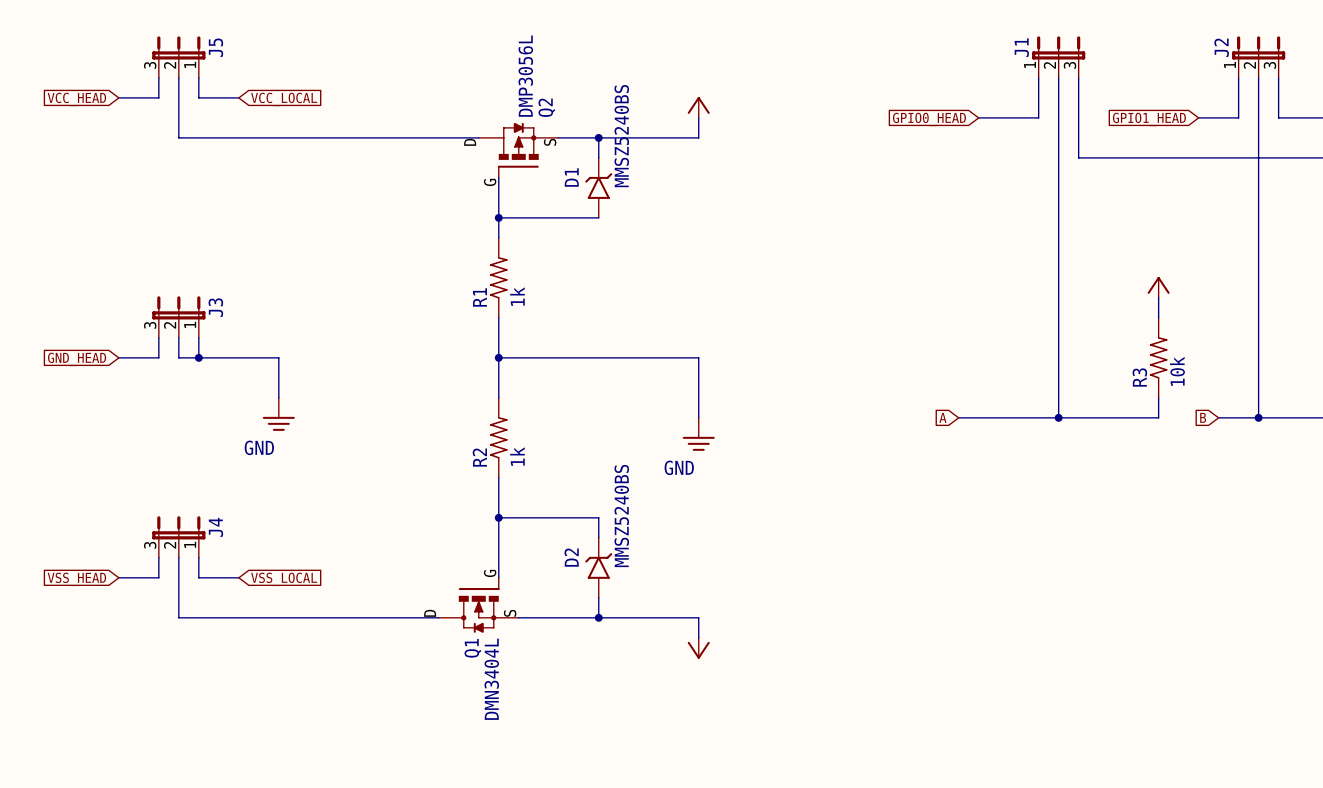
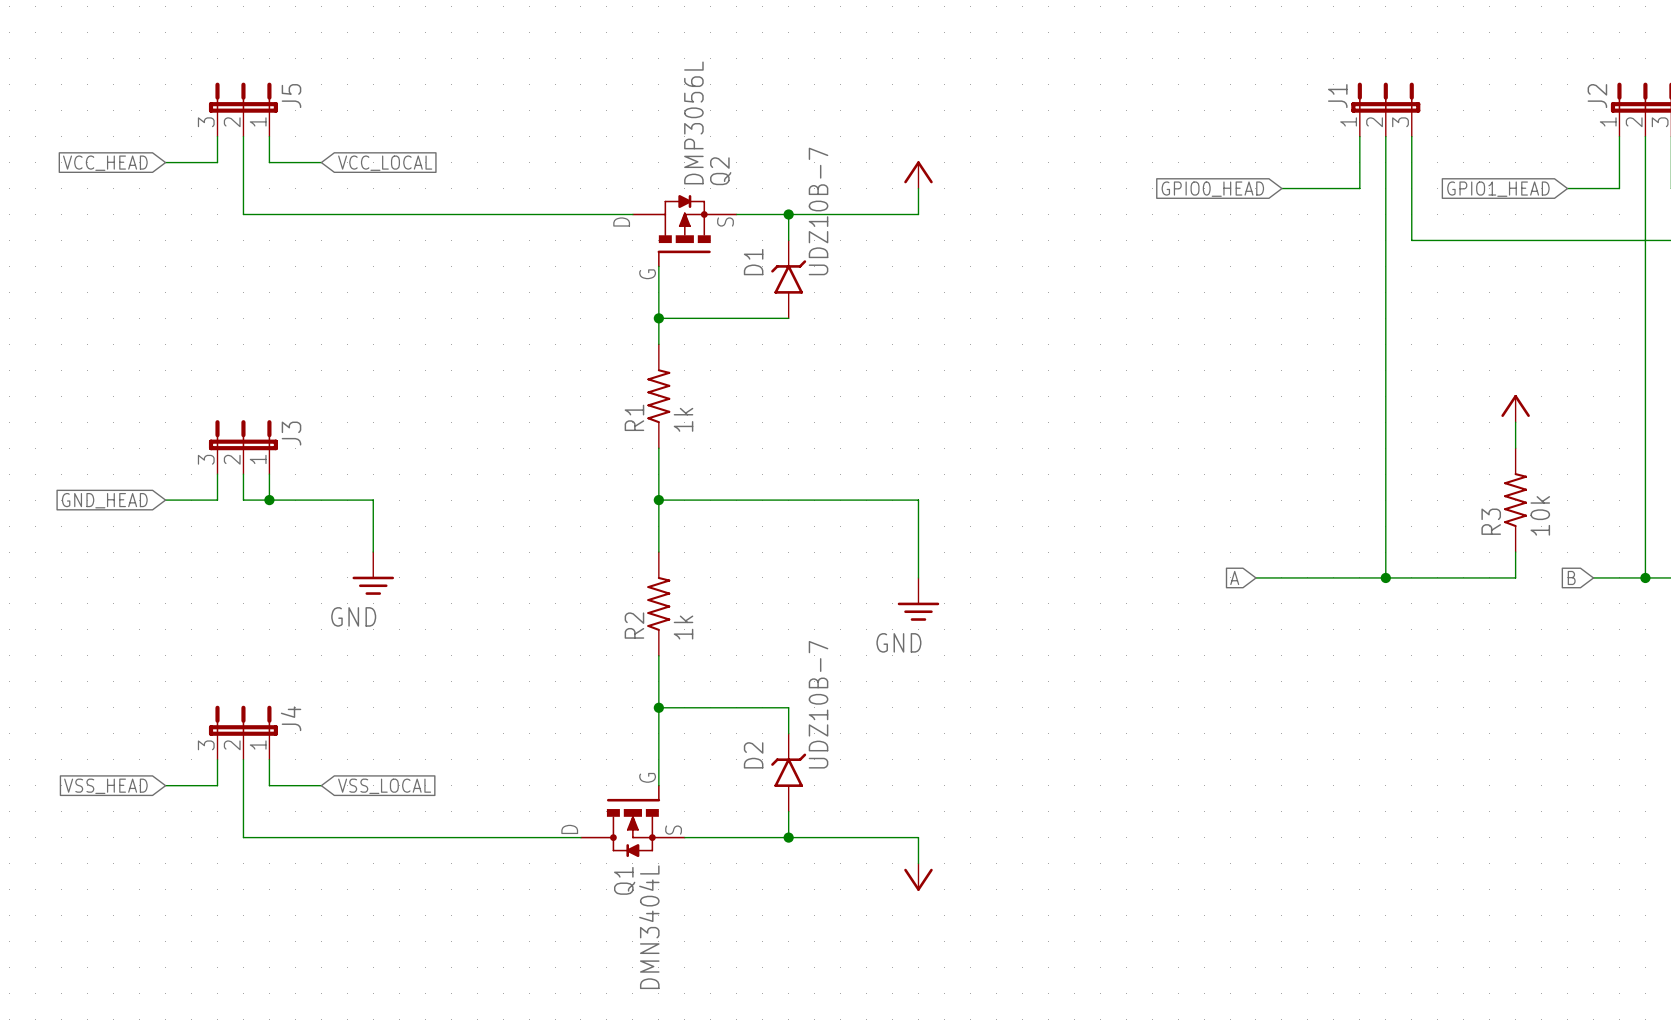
D1 value: MMSZ5240BS (621, 136) -> UDZ10B-7 (818, 211)
D2 value: MMSZ5240BS (621, 516) -> UDZ10B-7 (818, 704)

